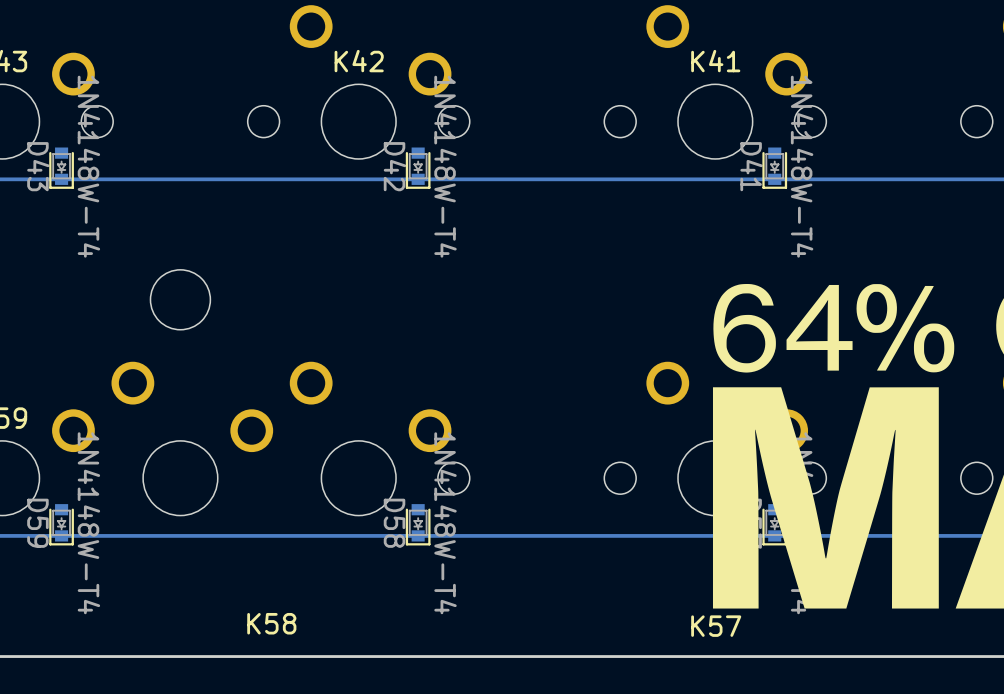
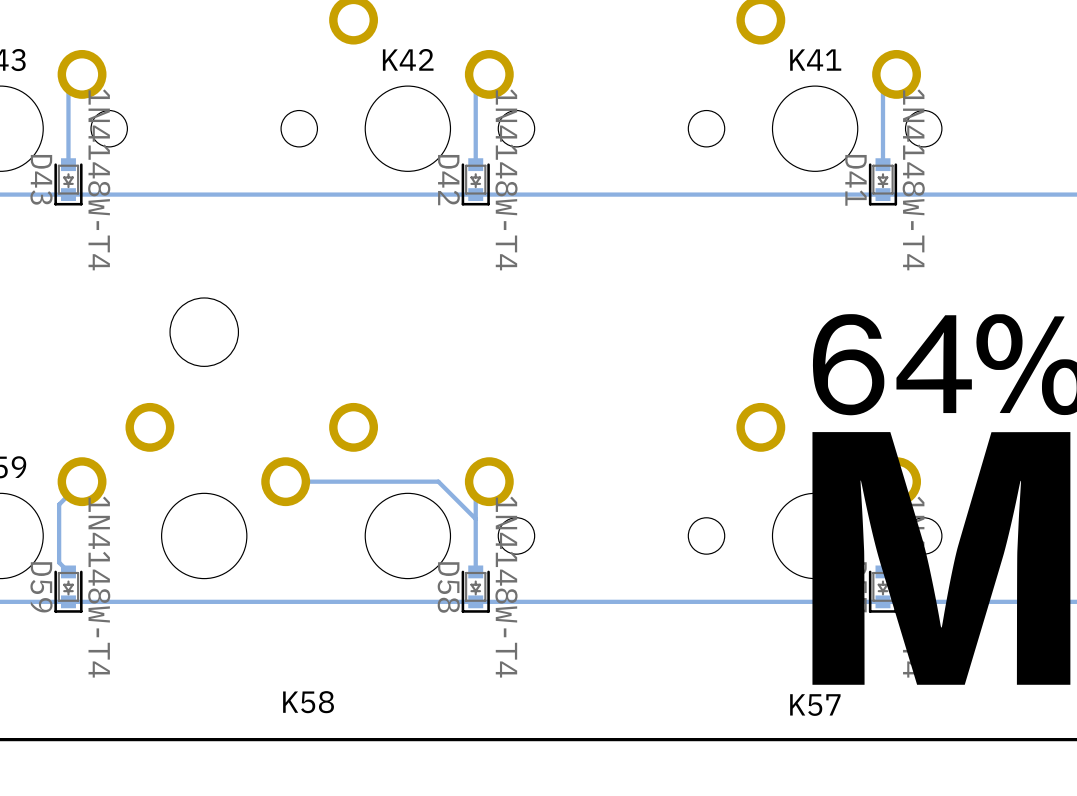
track: none -> (68, 87) (68, 164)
track: none -> (475, 87) (475, 164)
track: none -> (882, 87) (882, 164)
track: none -> (82, 481) (59, 504) (59, 562) (68, 571)
track: none -> (285, 481) (438, 481) (475, 519)
track: none -> (475, 495) (475, 571)

